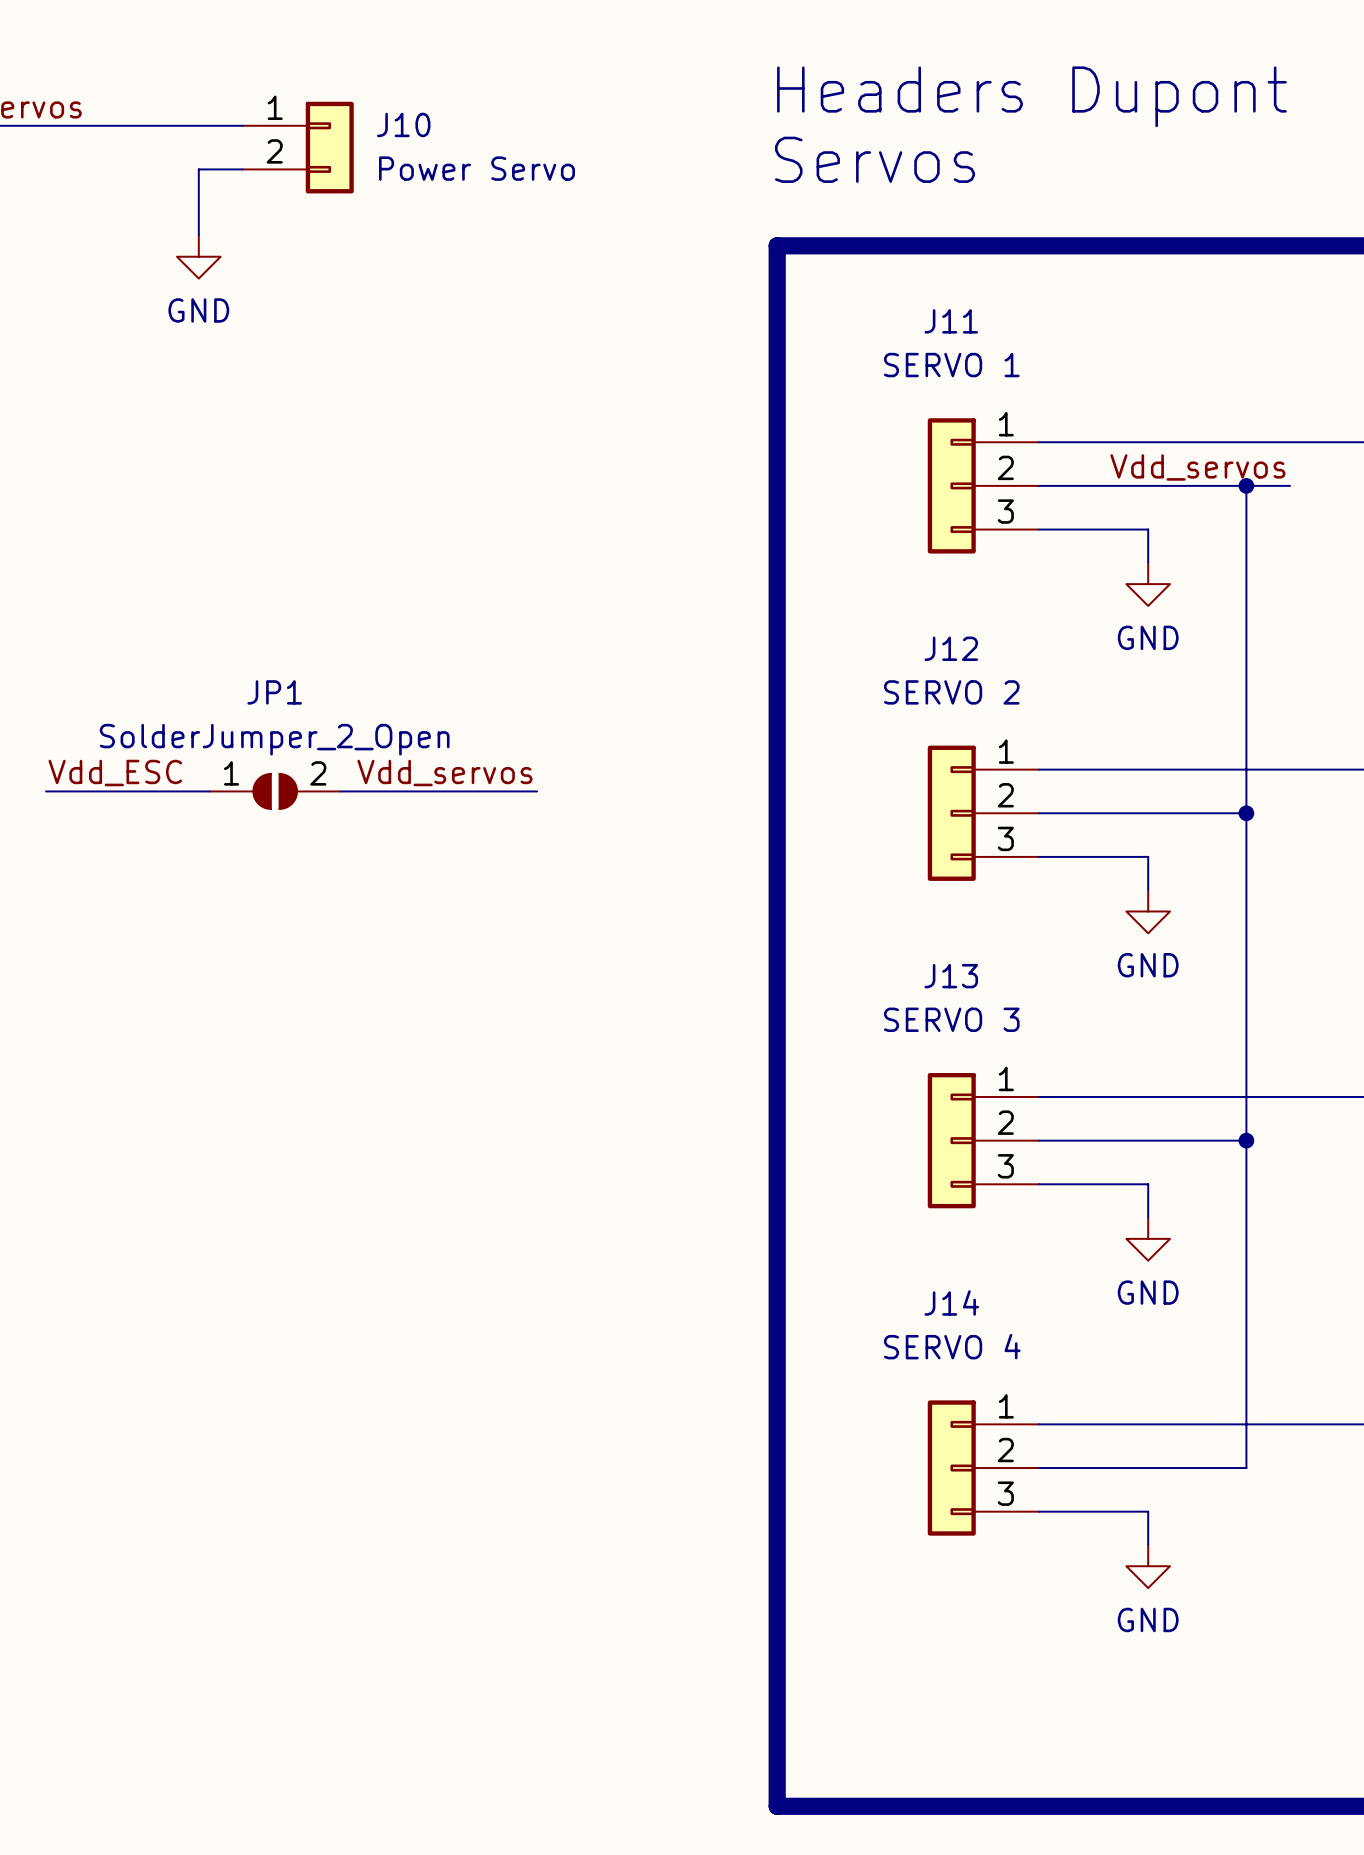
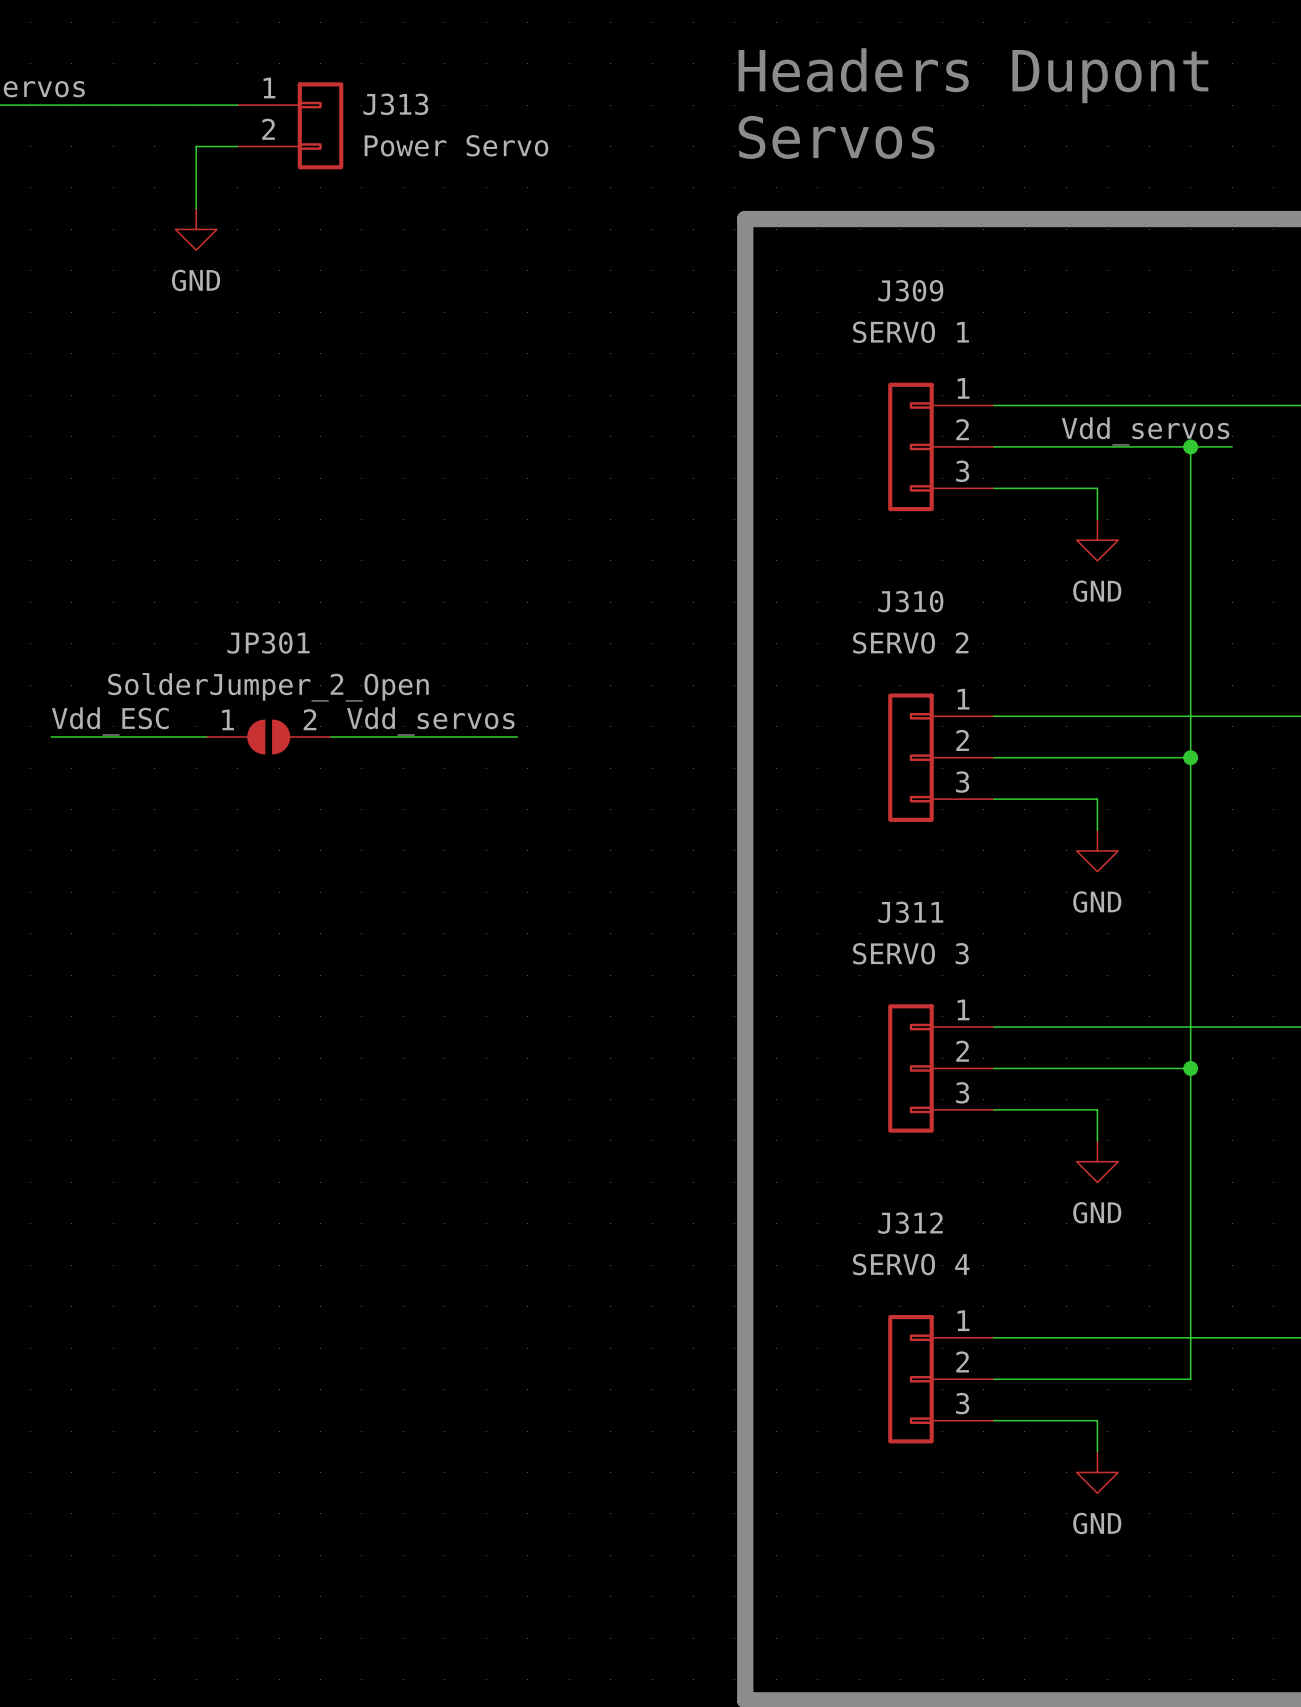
J10 name: J10 (403, 124) -> J313 (395, 104)
J11 name: J11 (951, 321) -> J309 (910, 290)
J12 name: J12 (951, 648) -> J310 (910, 601)
JP1 name: JP1 (274, 692) -> JP301 (268, 643)
J13 name: J13 (951, 976) -> J311 (910, 912)
J14 name: J14 (951, 1303) -> J312 (910, 1223)

